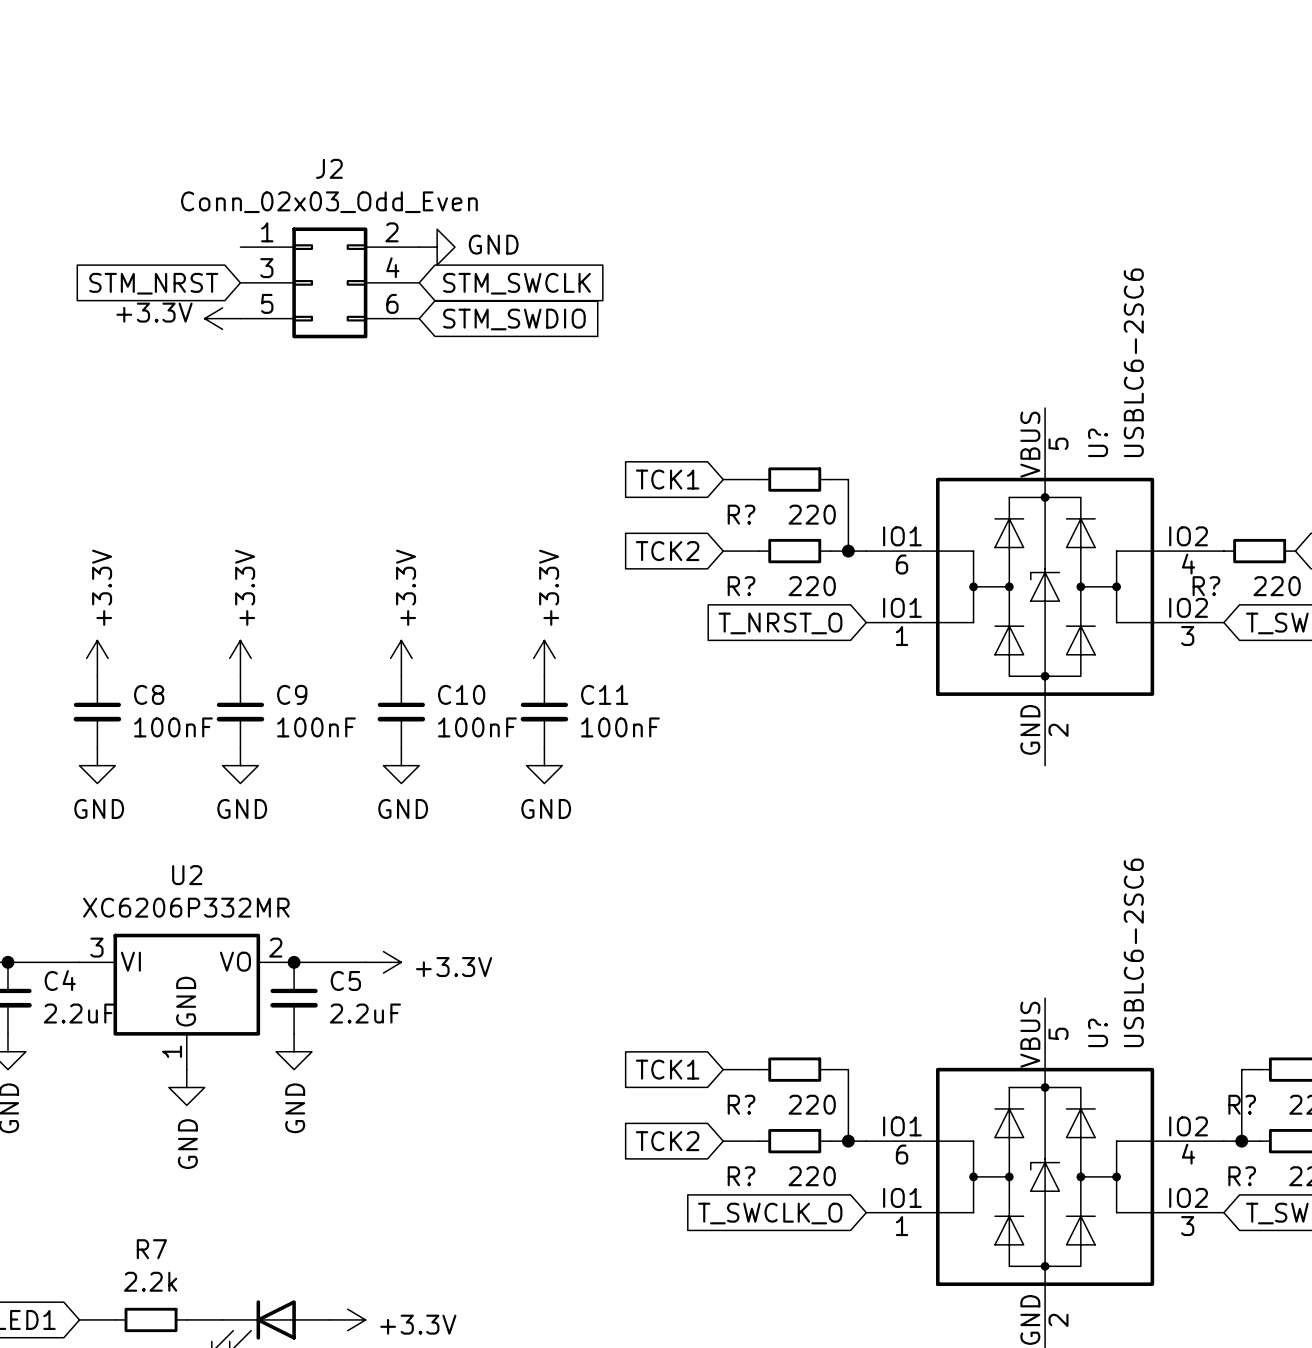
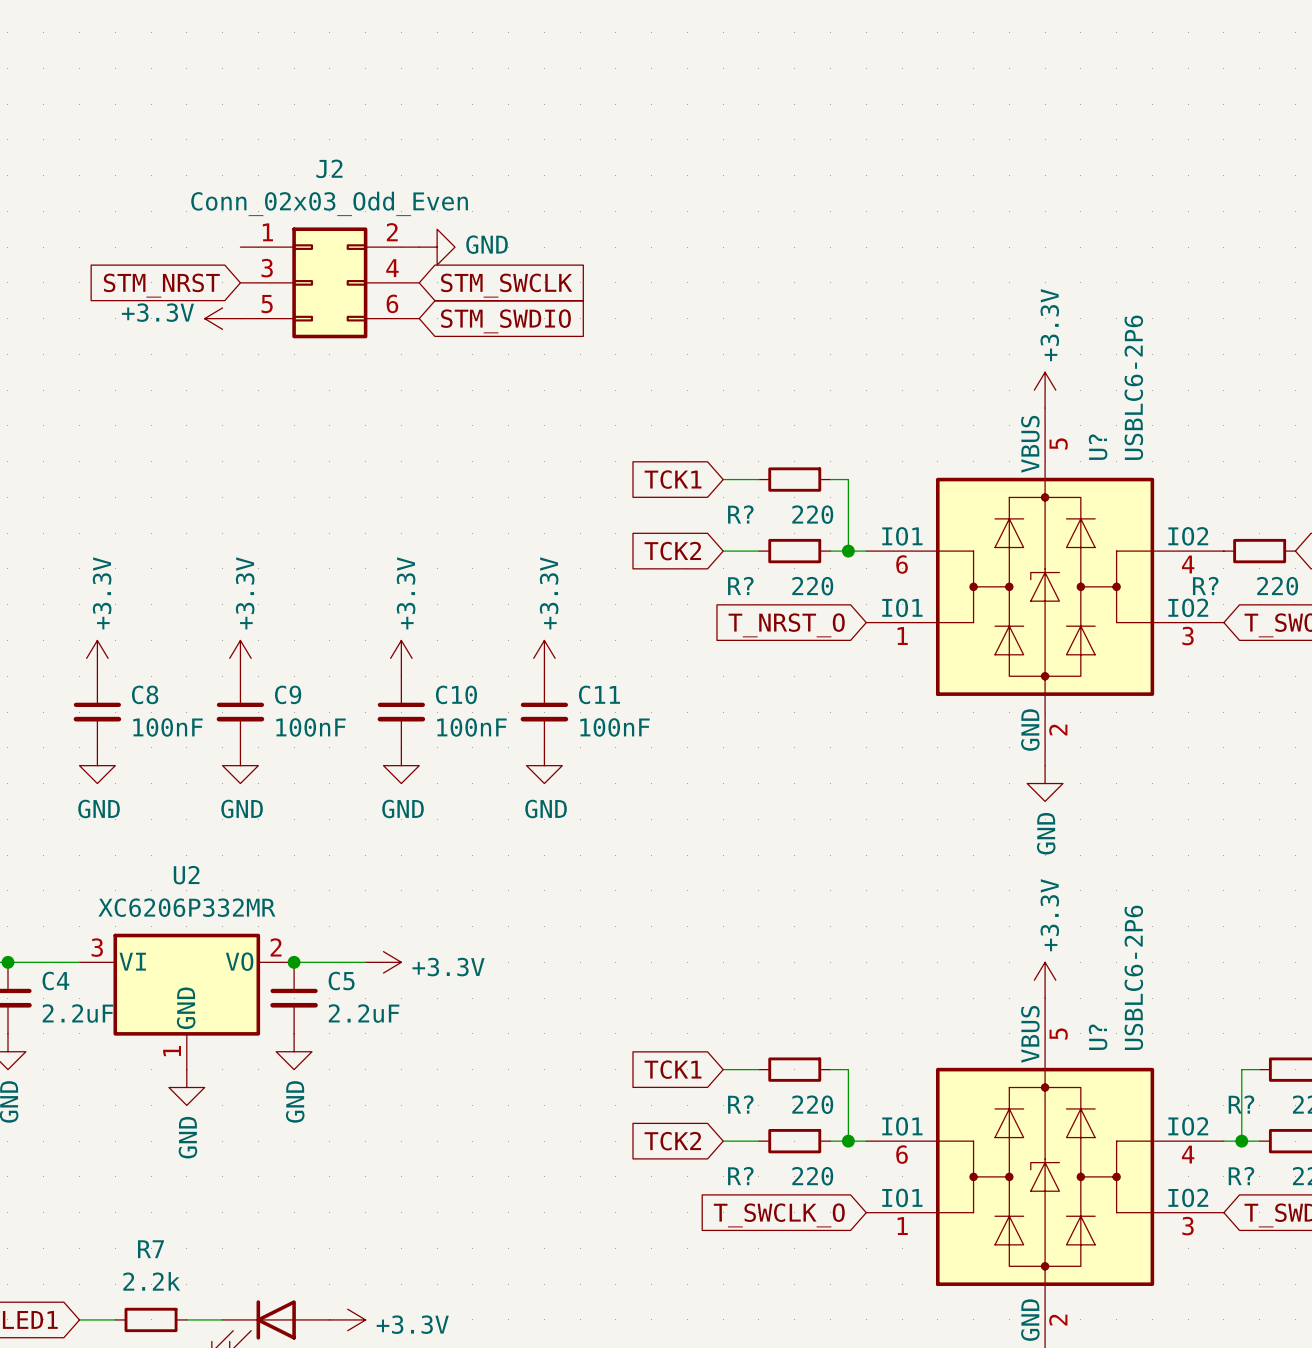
U? value: USBLC6-2SC6 (1133, 362) -> USBLC6-2P6 (1133, 387)
power symbol: none -> +3.3V (1045, 390)
power symbol: none -> GND (1045, 783)
U? value: USBLC6-2SC6 (1133, 952) -> USBLC6-2P6 (1133, 977)
power symbol: none -> +3.3V (1045, 980)

